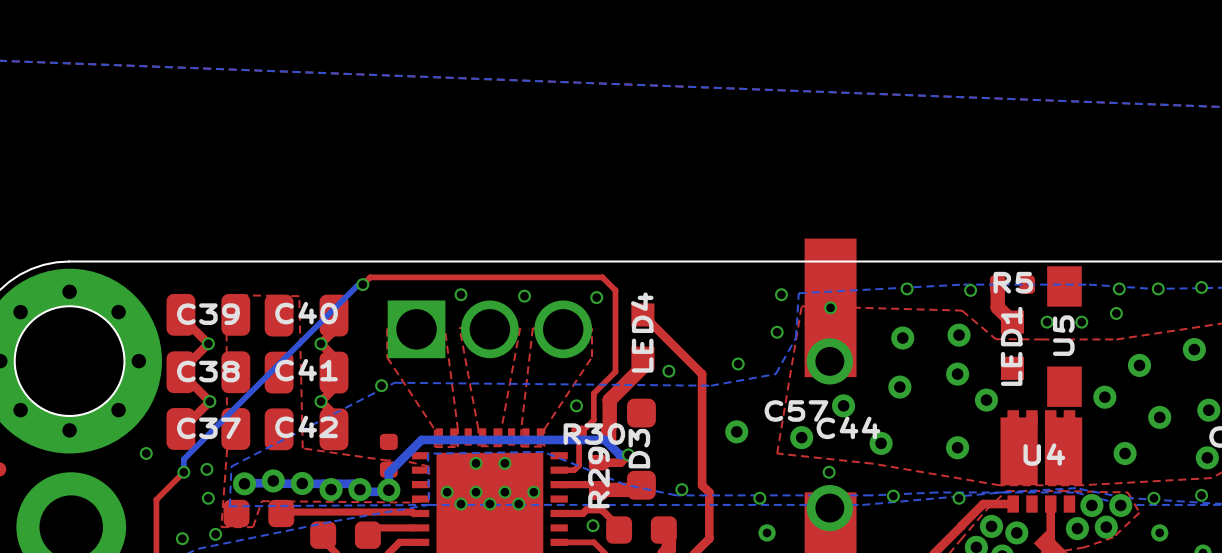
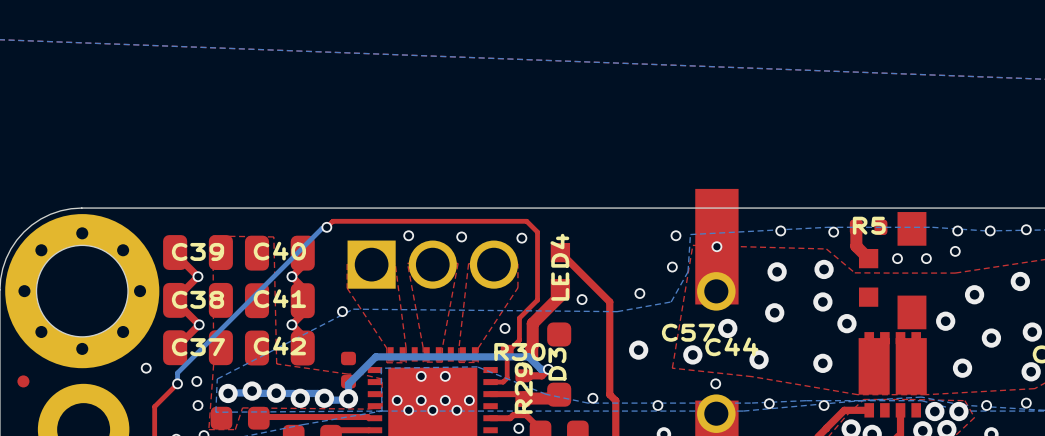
U5 name: U5 (1063, 335) -> none
LED1 name: LED1 (1011, 346) -> none
U4 name: U4 (1044, 454) -> none

